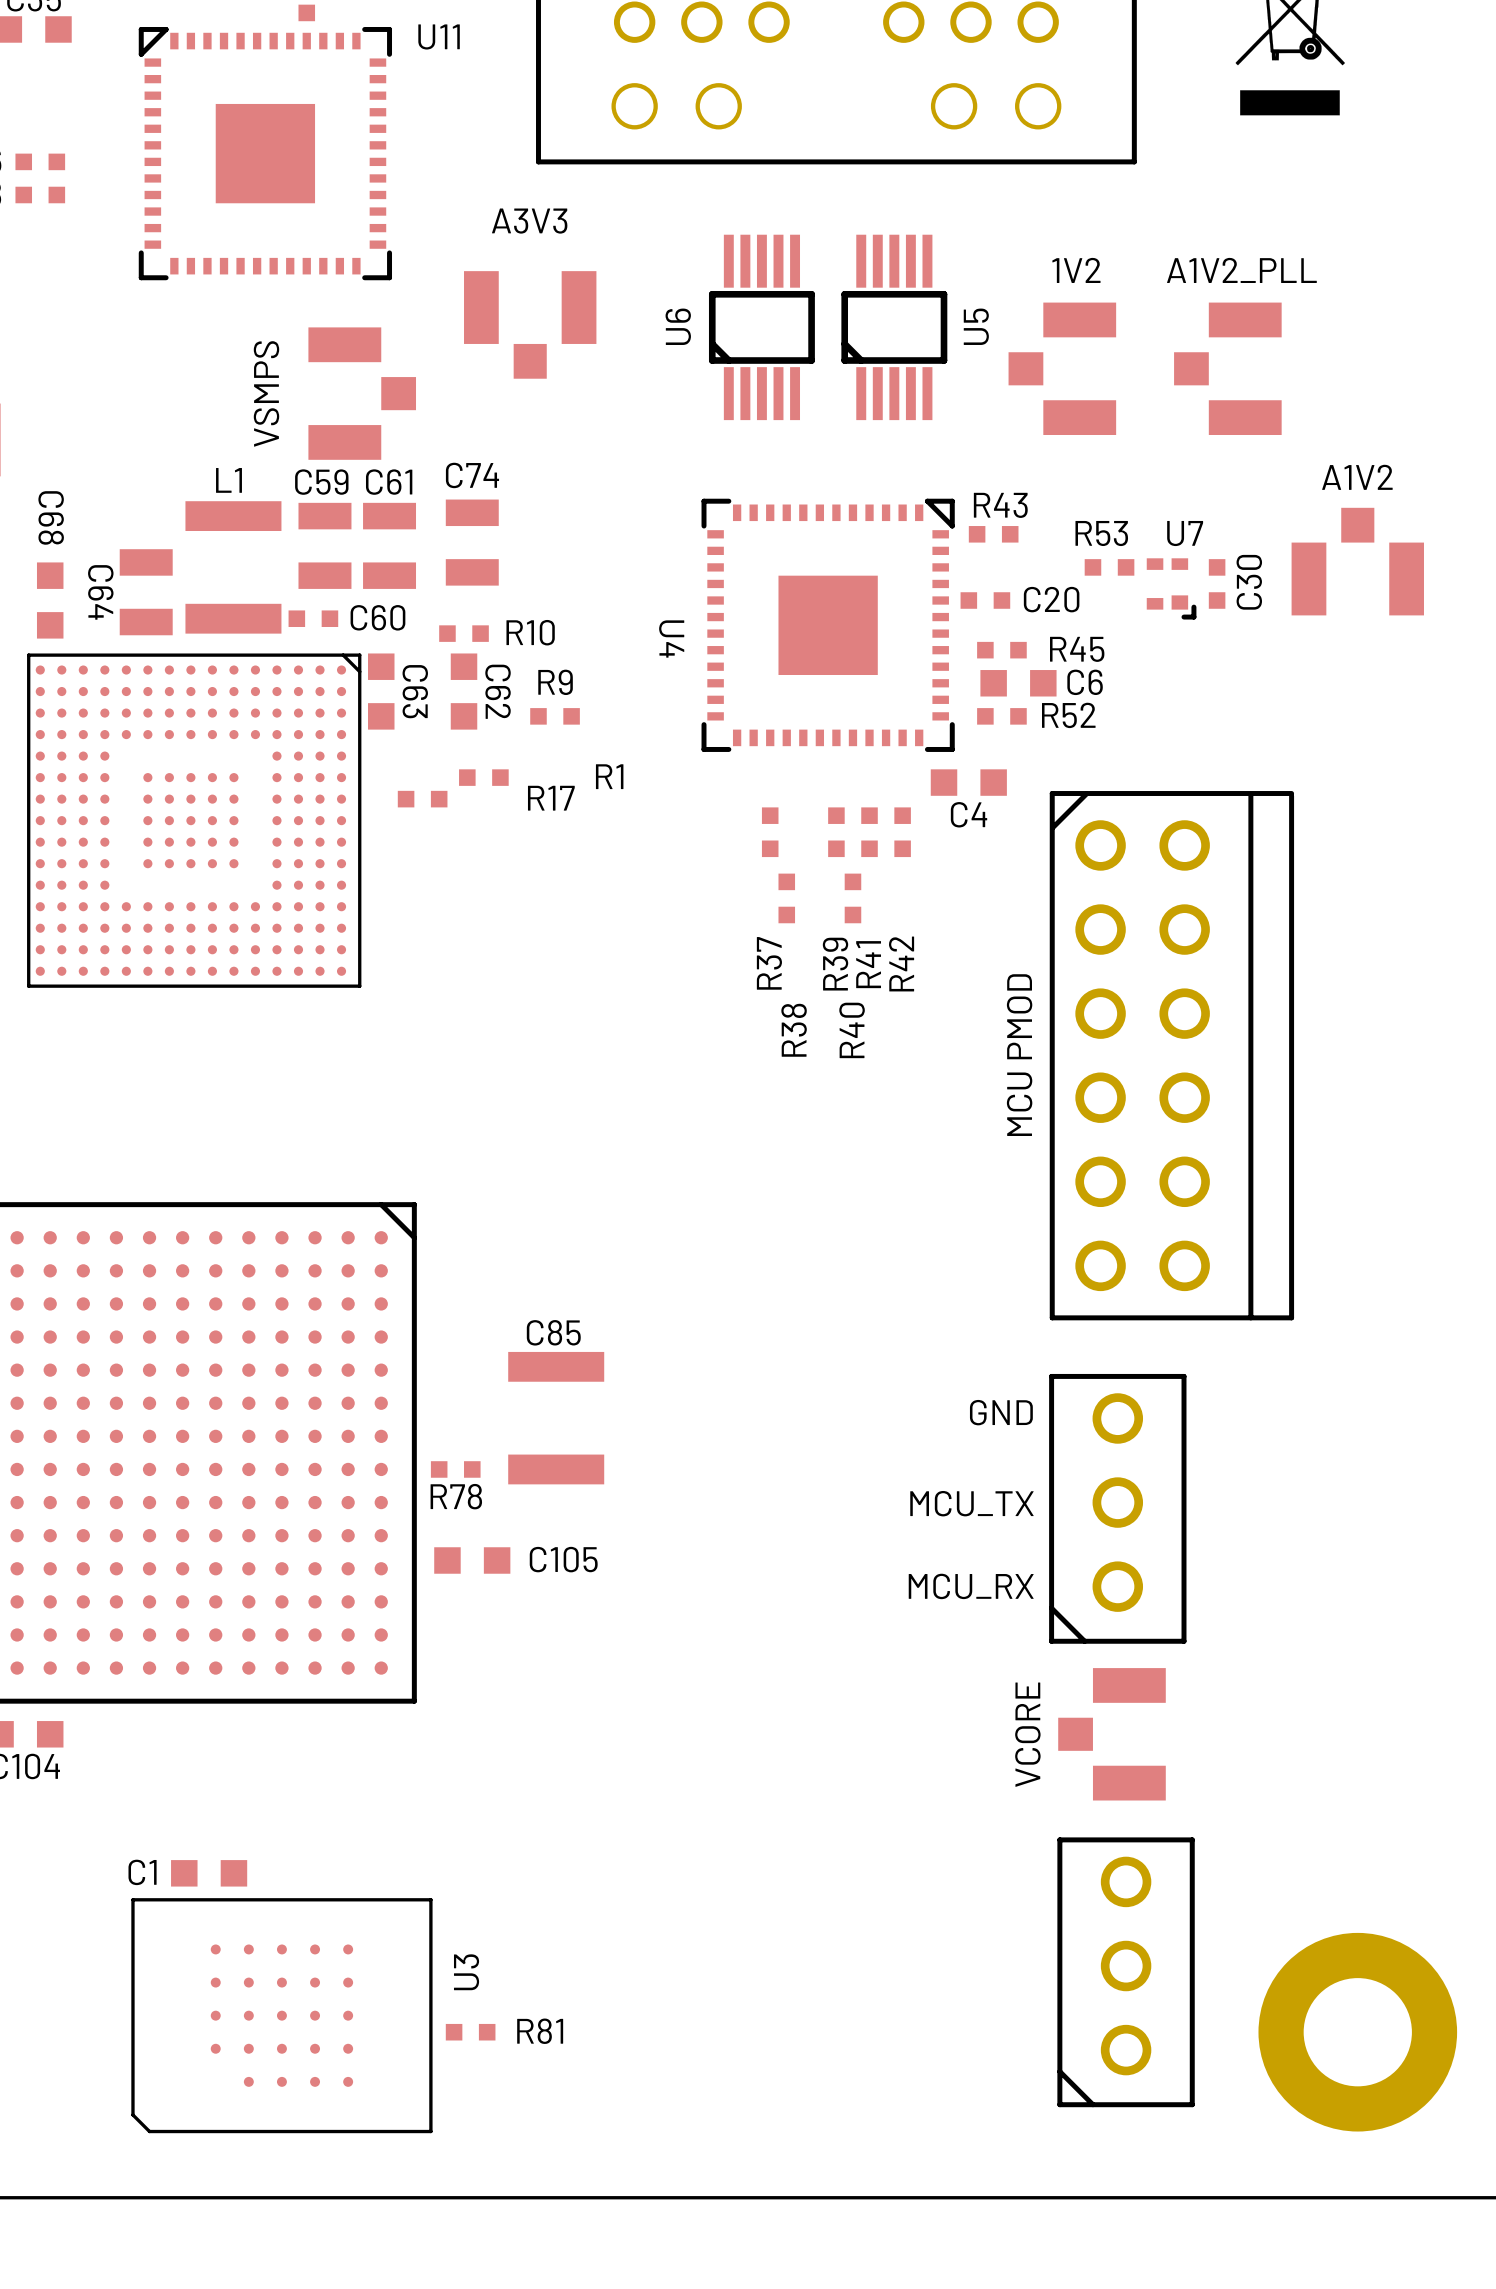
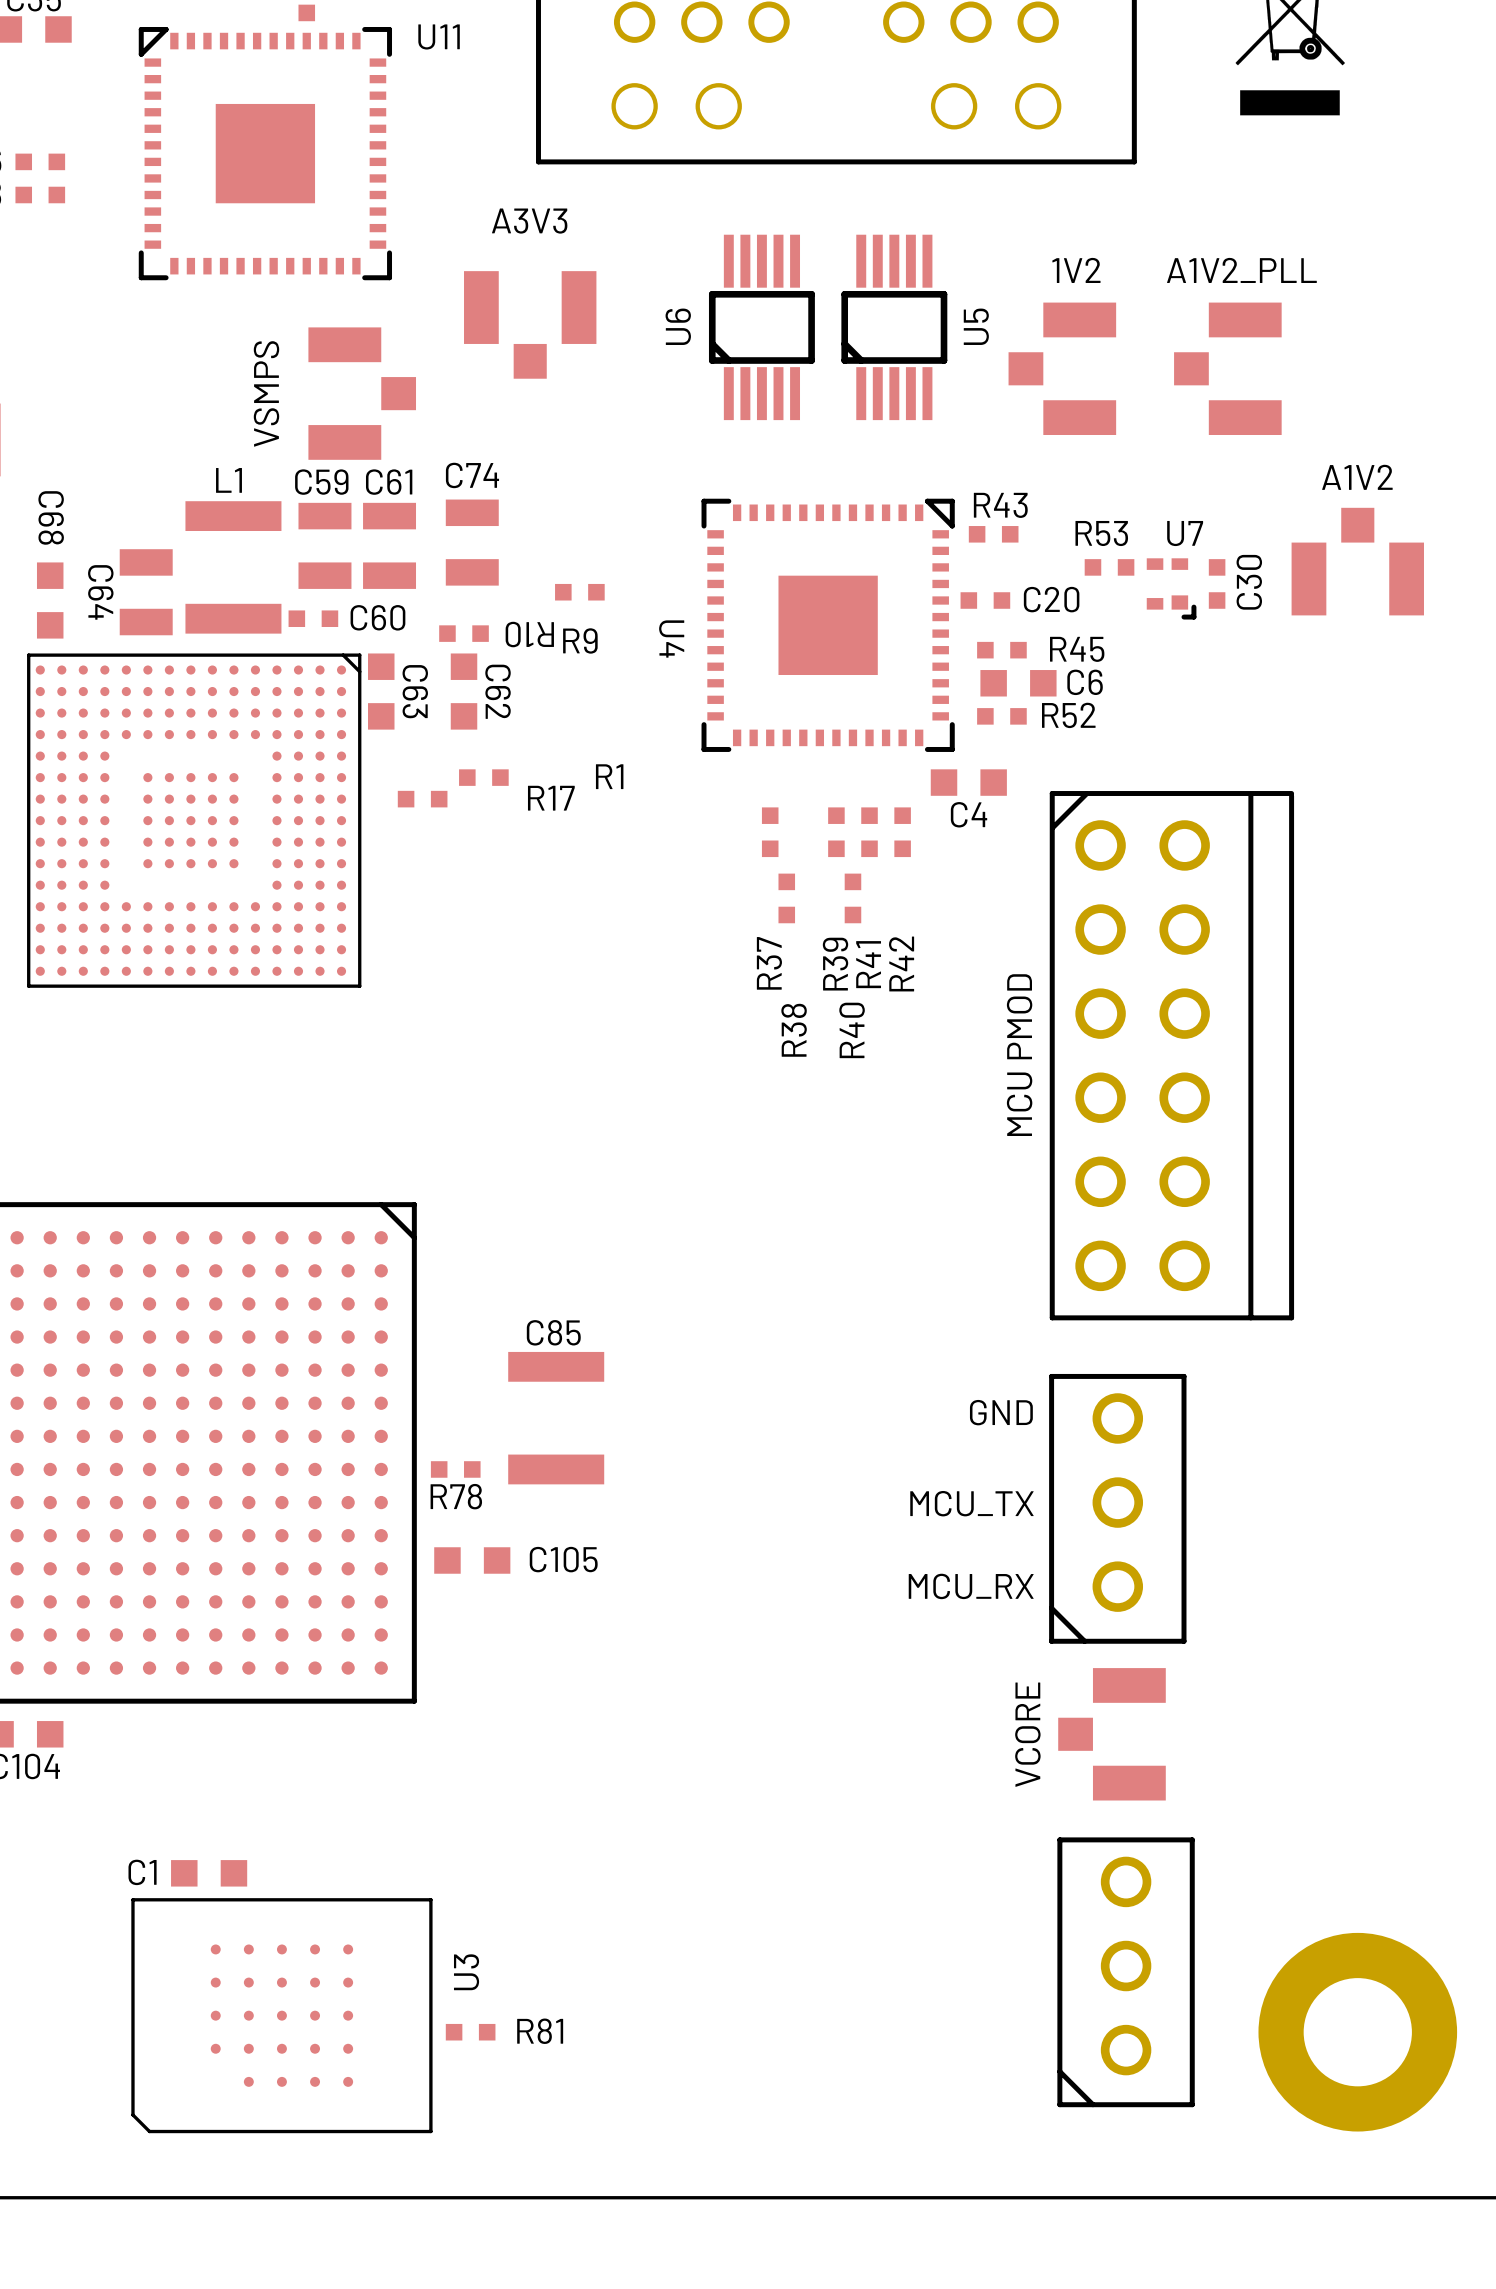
R10 name rotation: 0° (530, 632) -> 180° (529, 634)
R9 name position: R9 (555, 682) -> R9 (580, 640)
R9 position: (555, 716) -> (579, 592)

